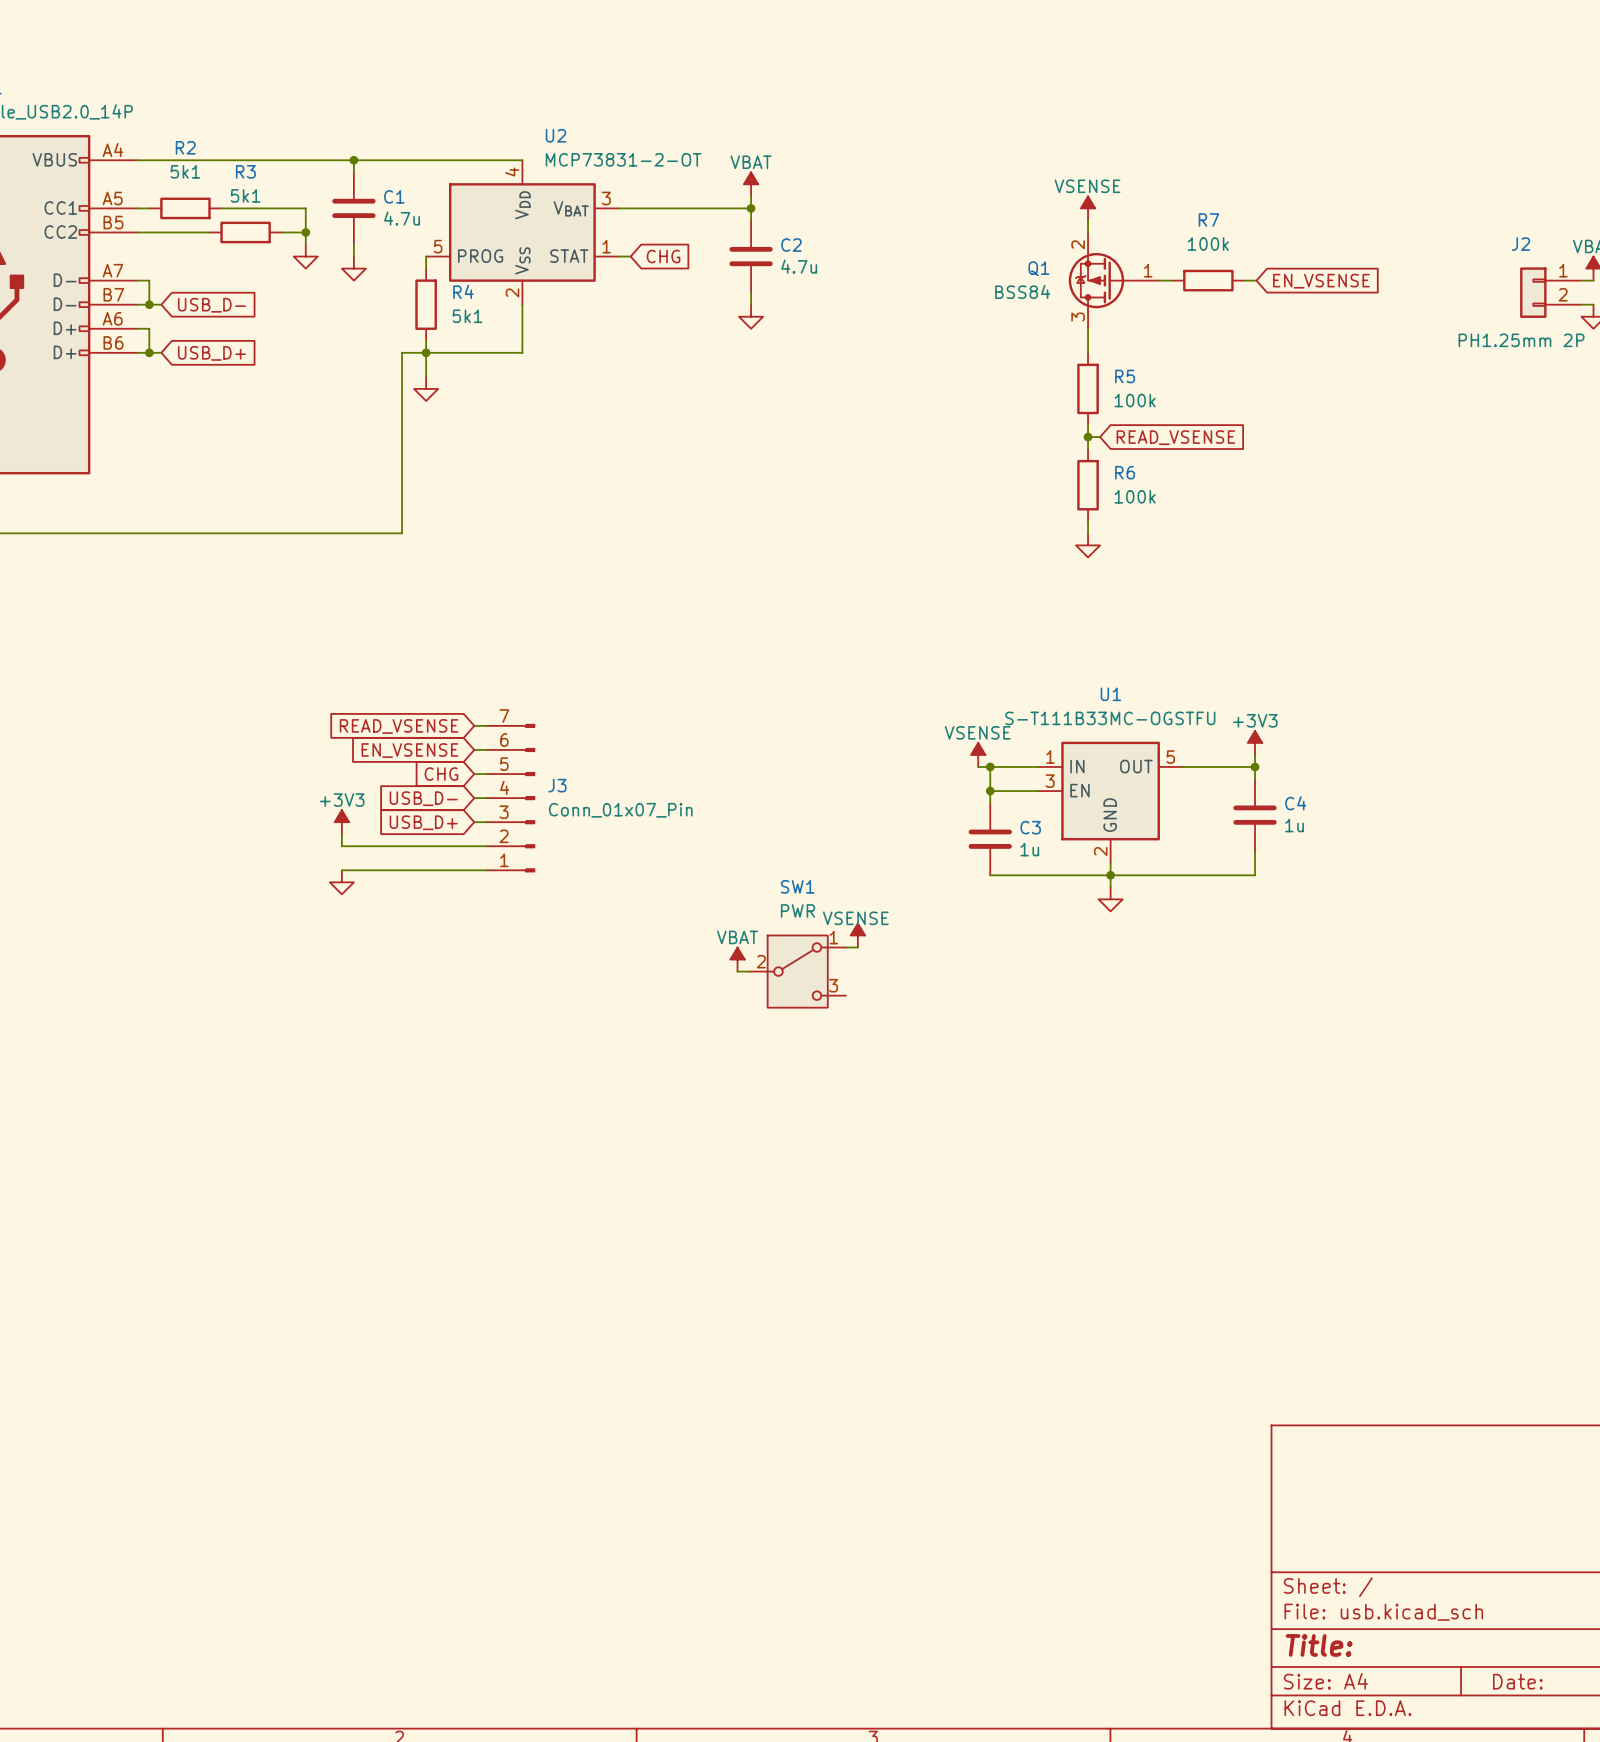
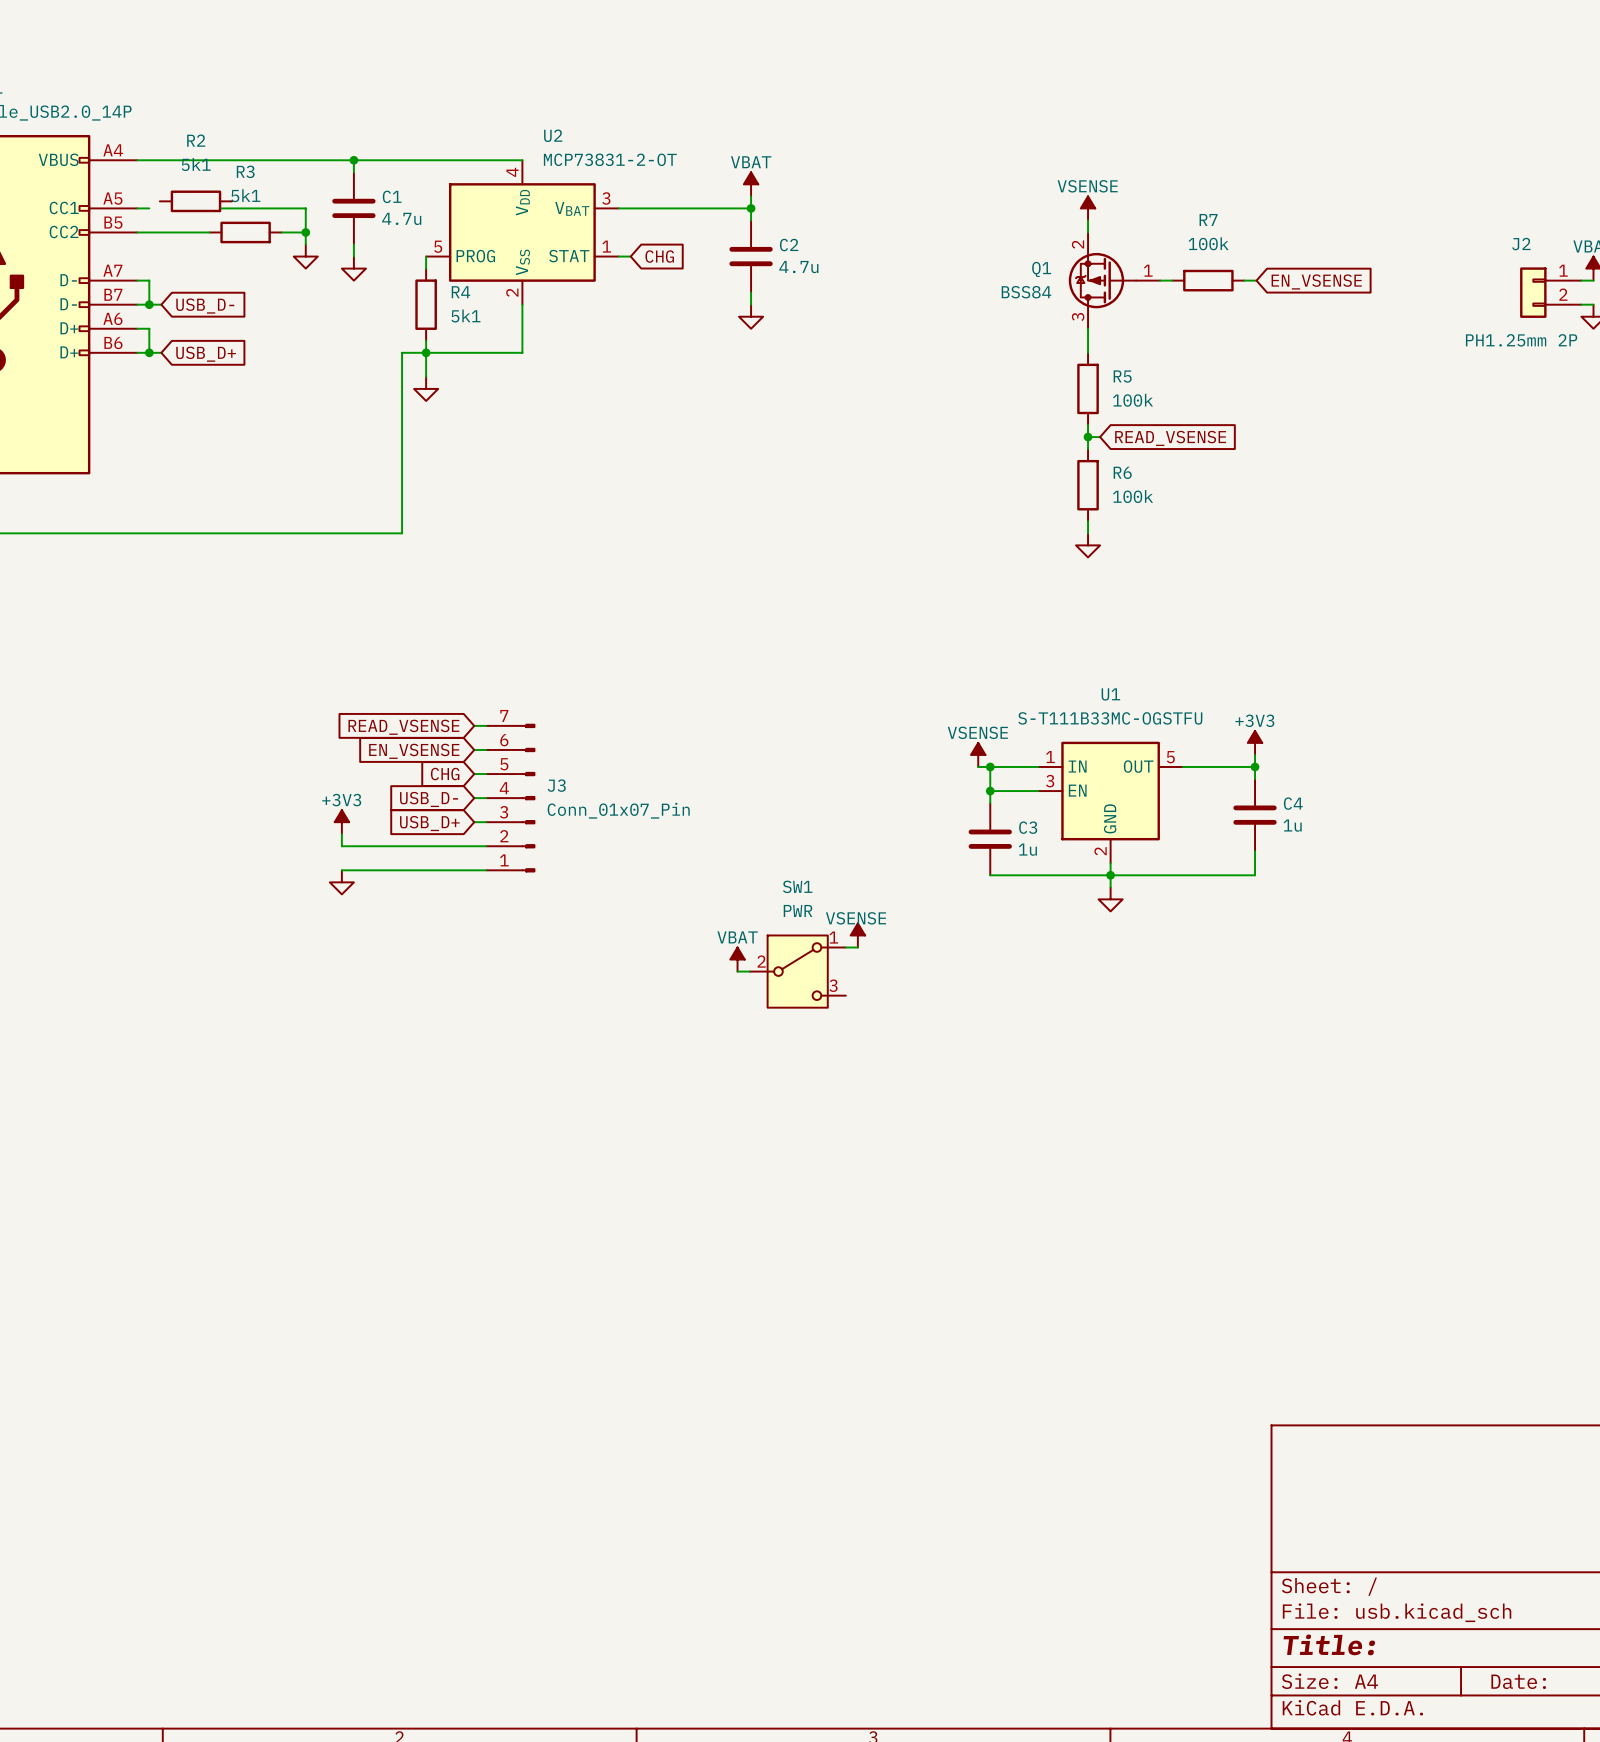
R2 position: (185, 208) -> (195, 201)

